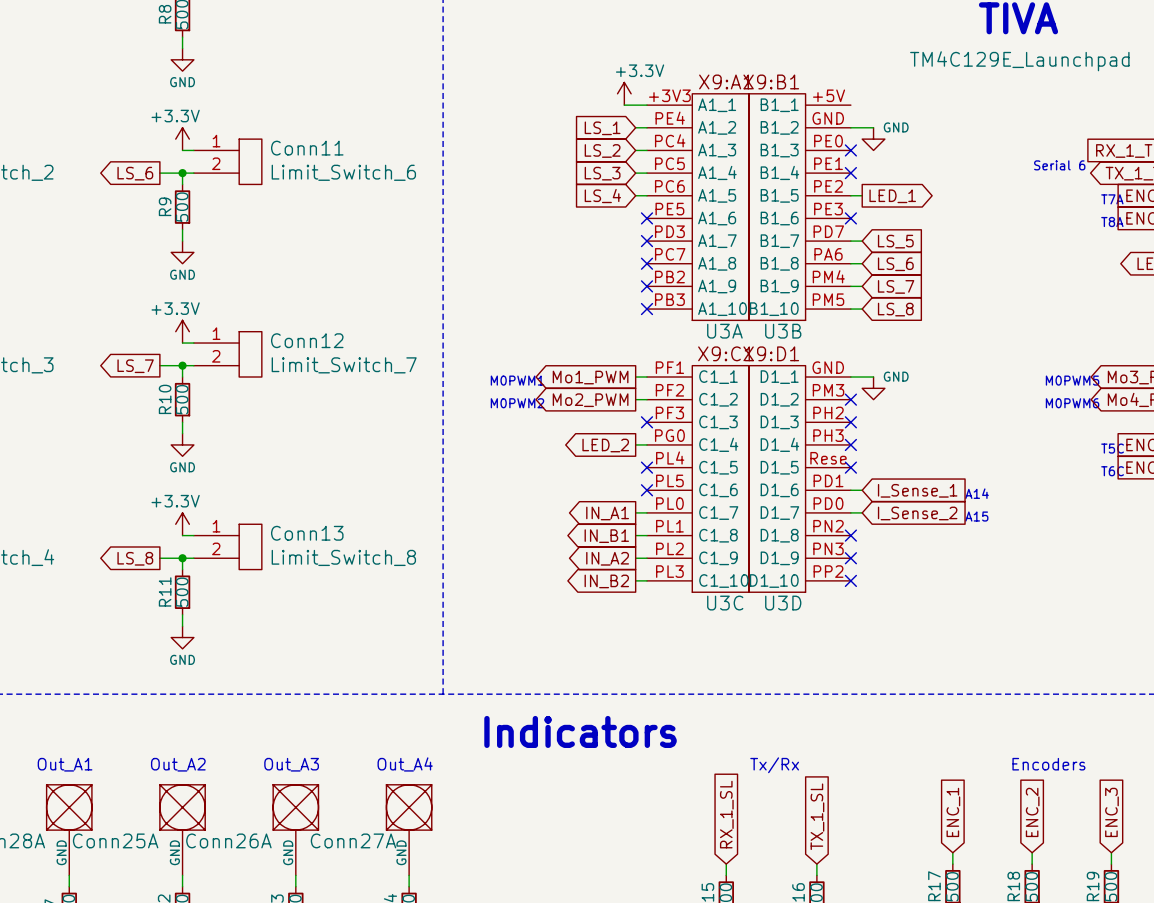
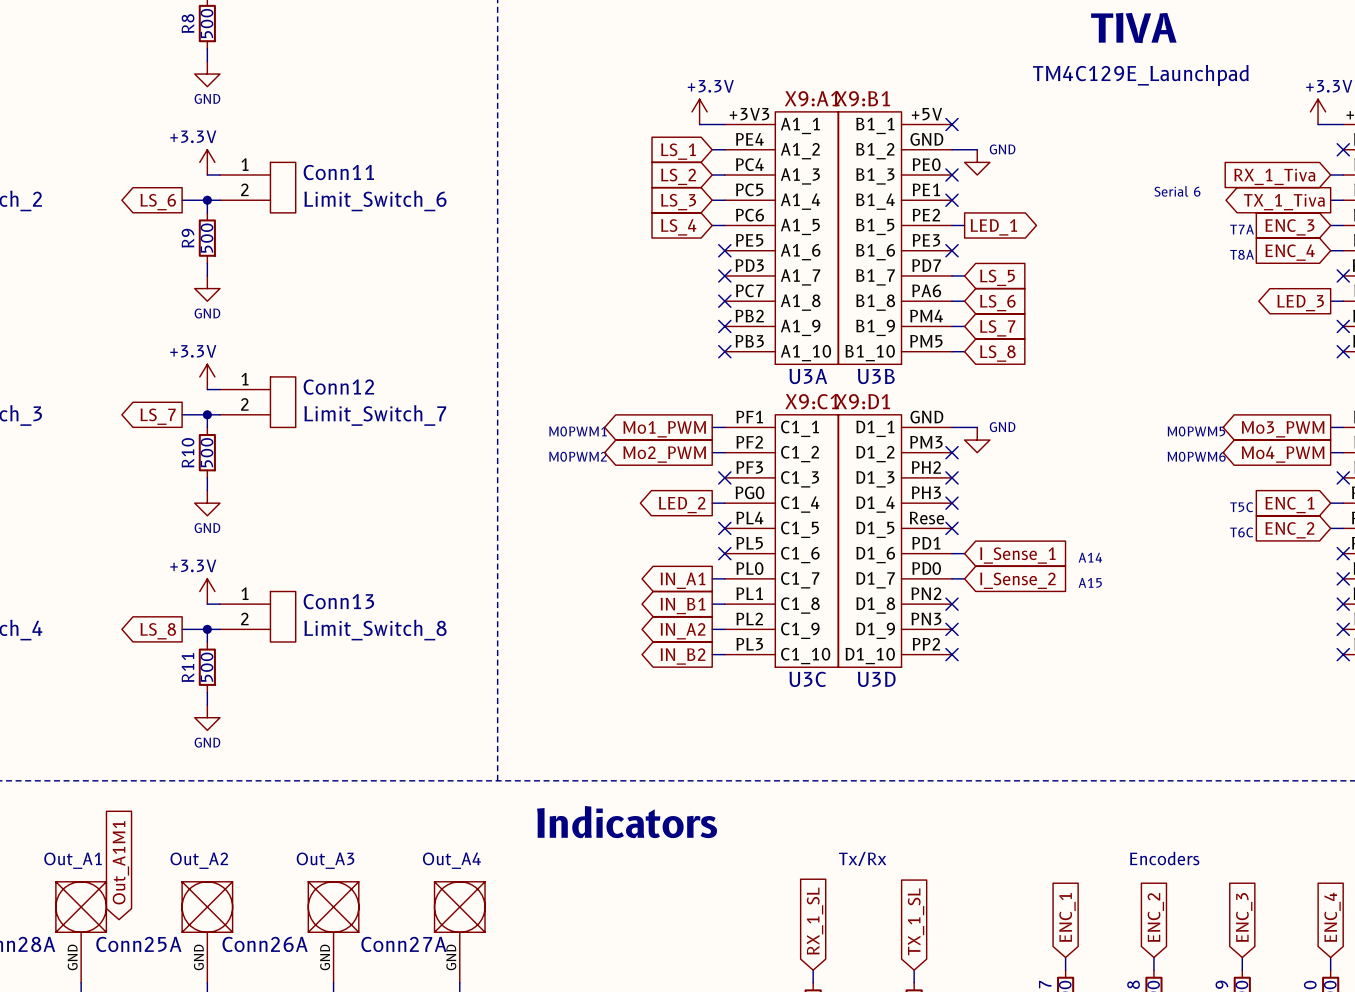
no-connect mark: none -> (952, 124)
global label: none -> Out_A1M1 (120, 862)

